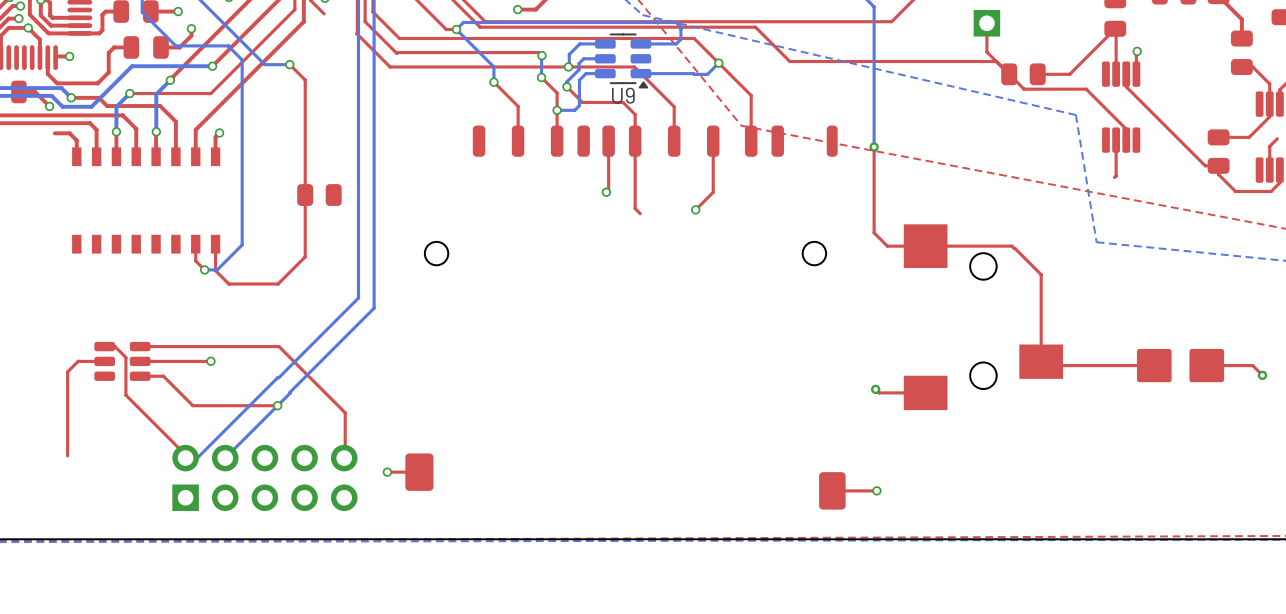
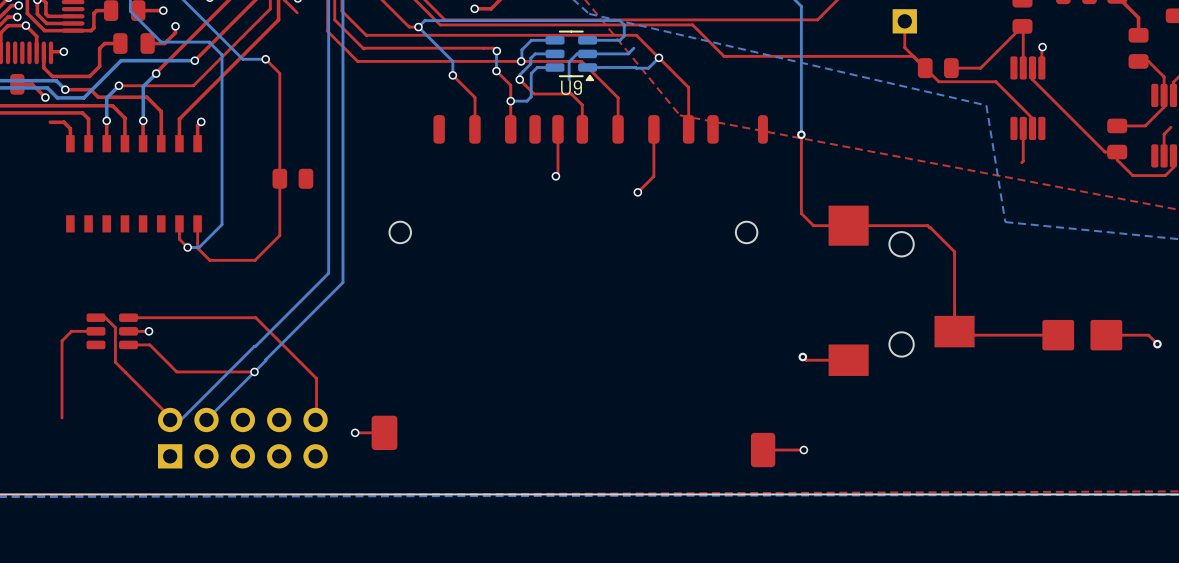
bottom track: none -> (633, 48) (628, 53) (577, 53) (569, 61) (569, 79)
top track: (635, 141) (635, 208) (640, 213) -> none
top track: (210, 361) (162, 361) -> none
via position: (210, 361) -> (149, 331)

